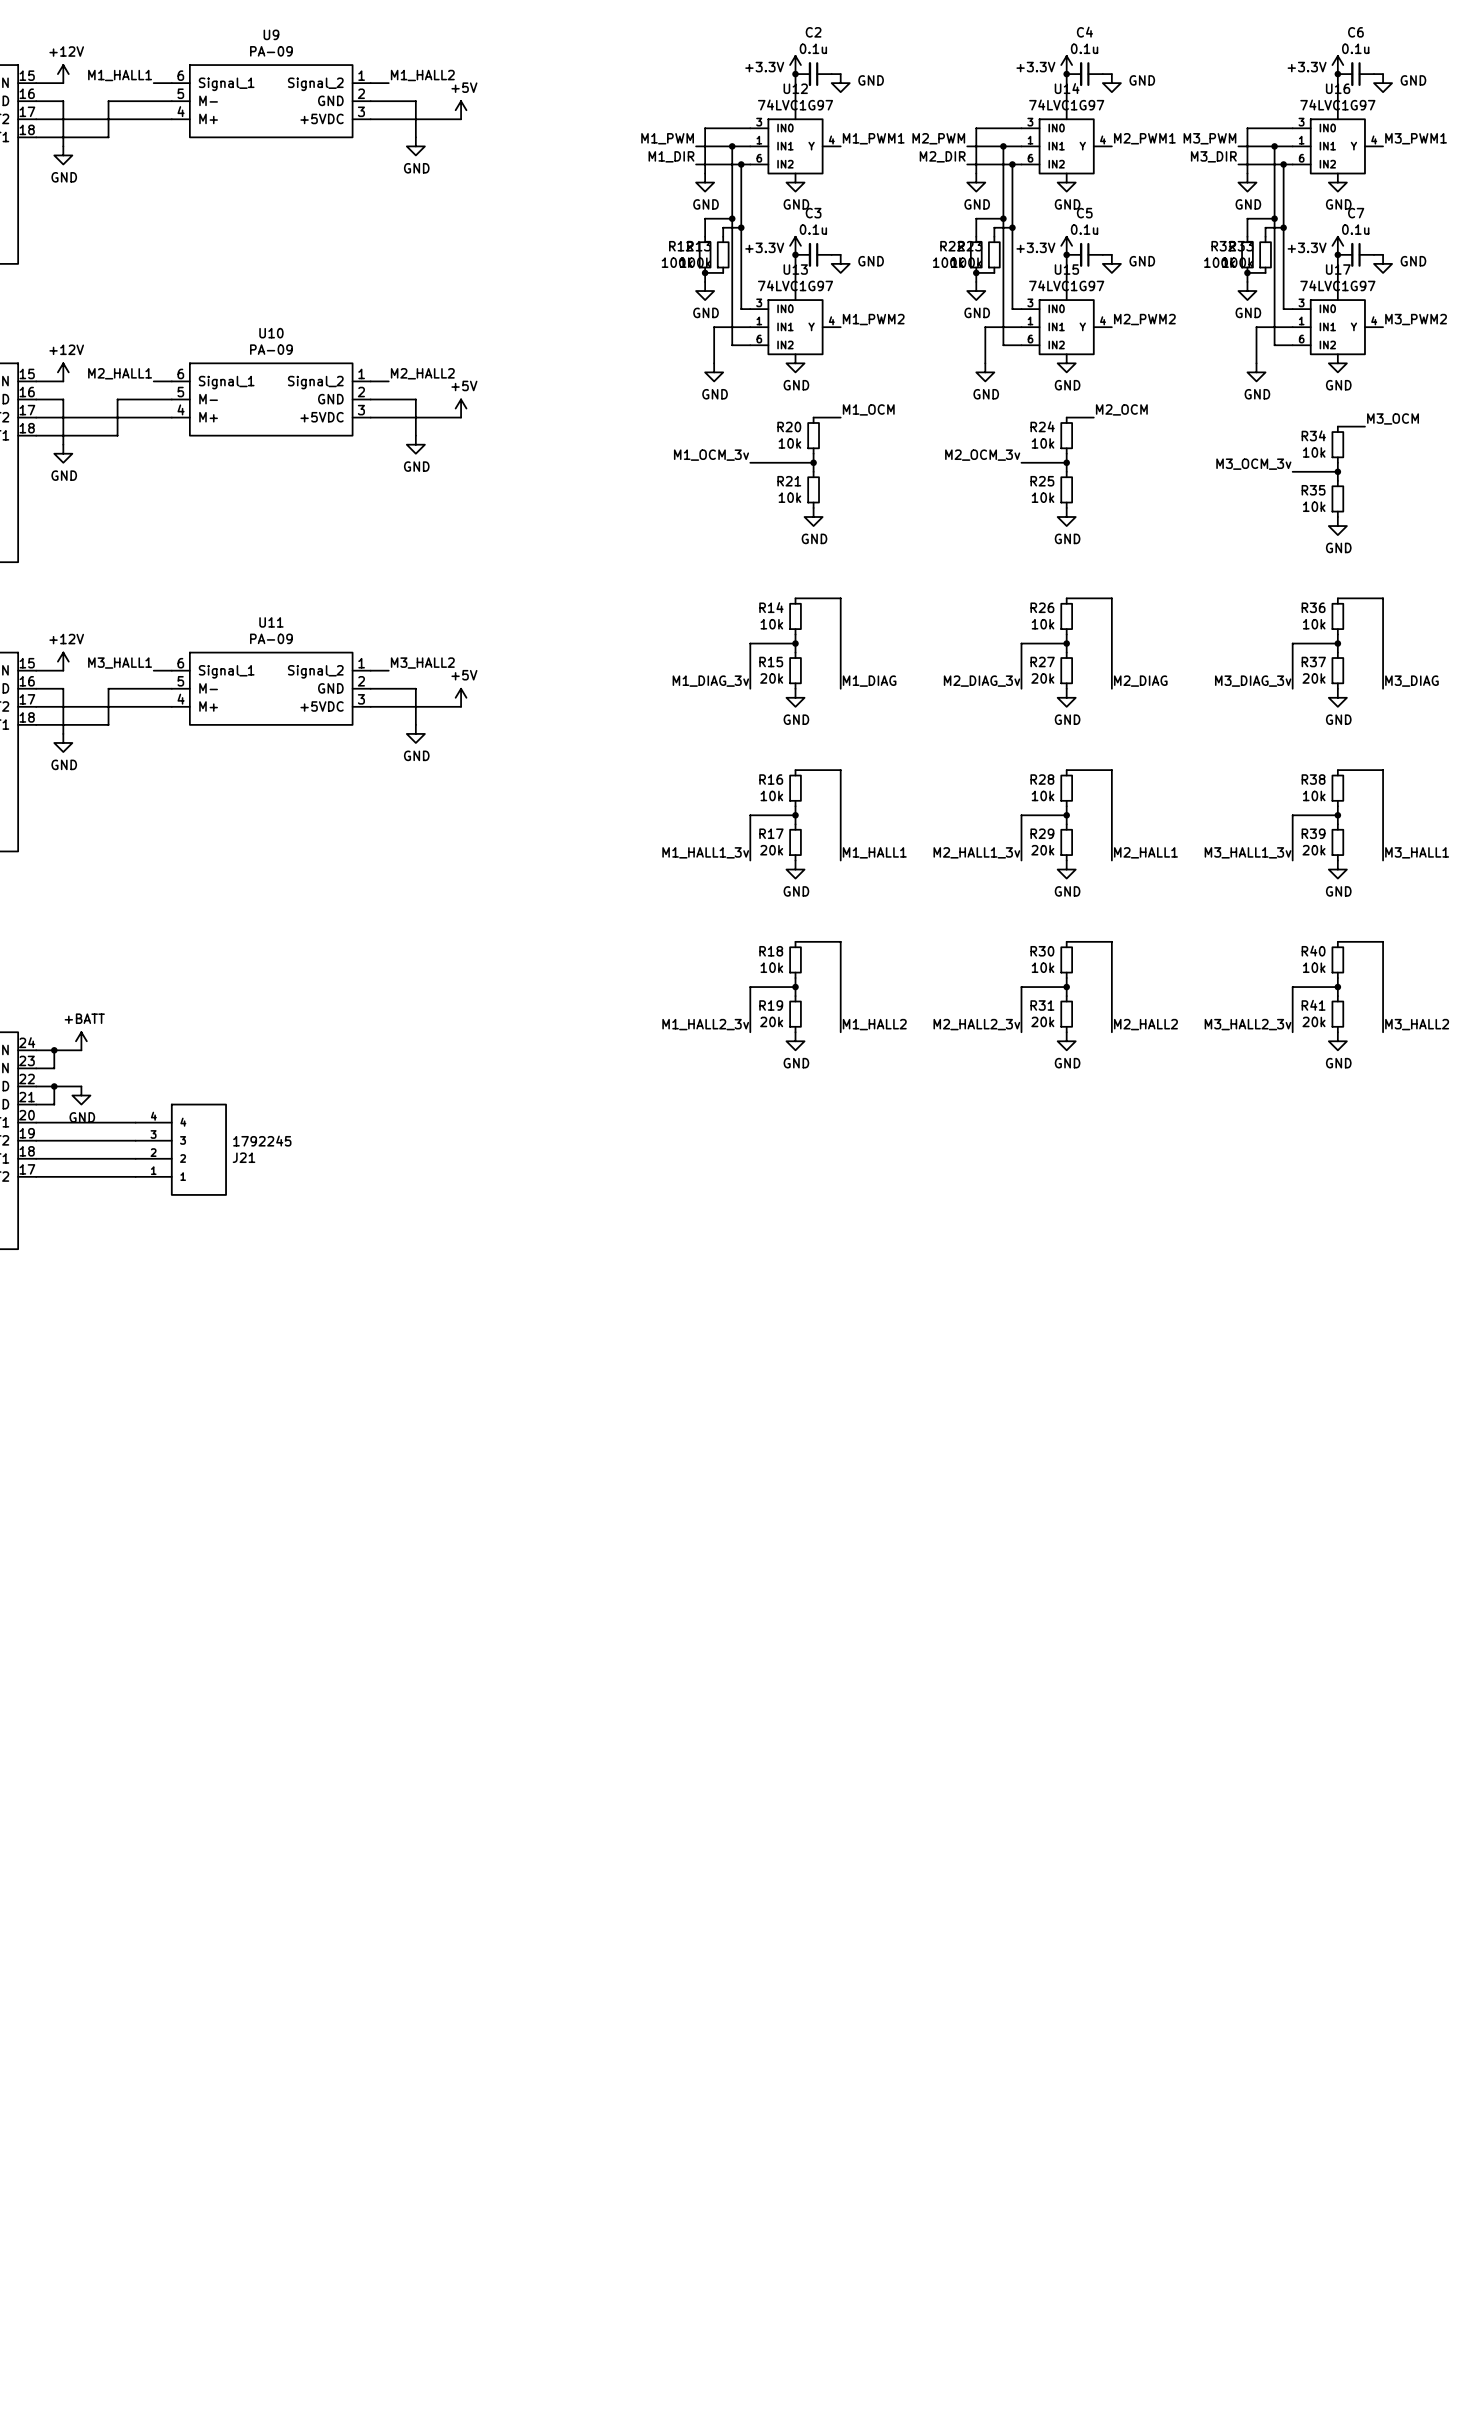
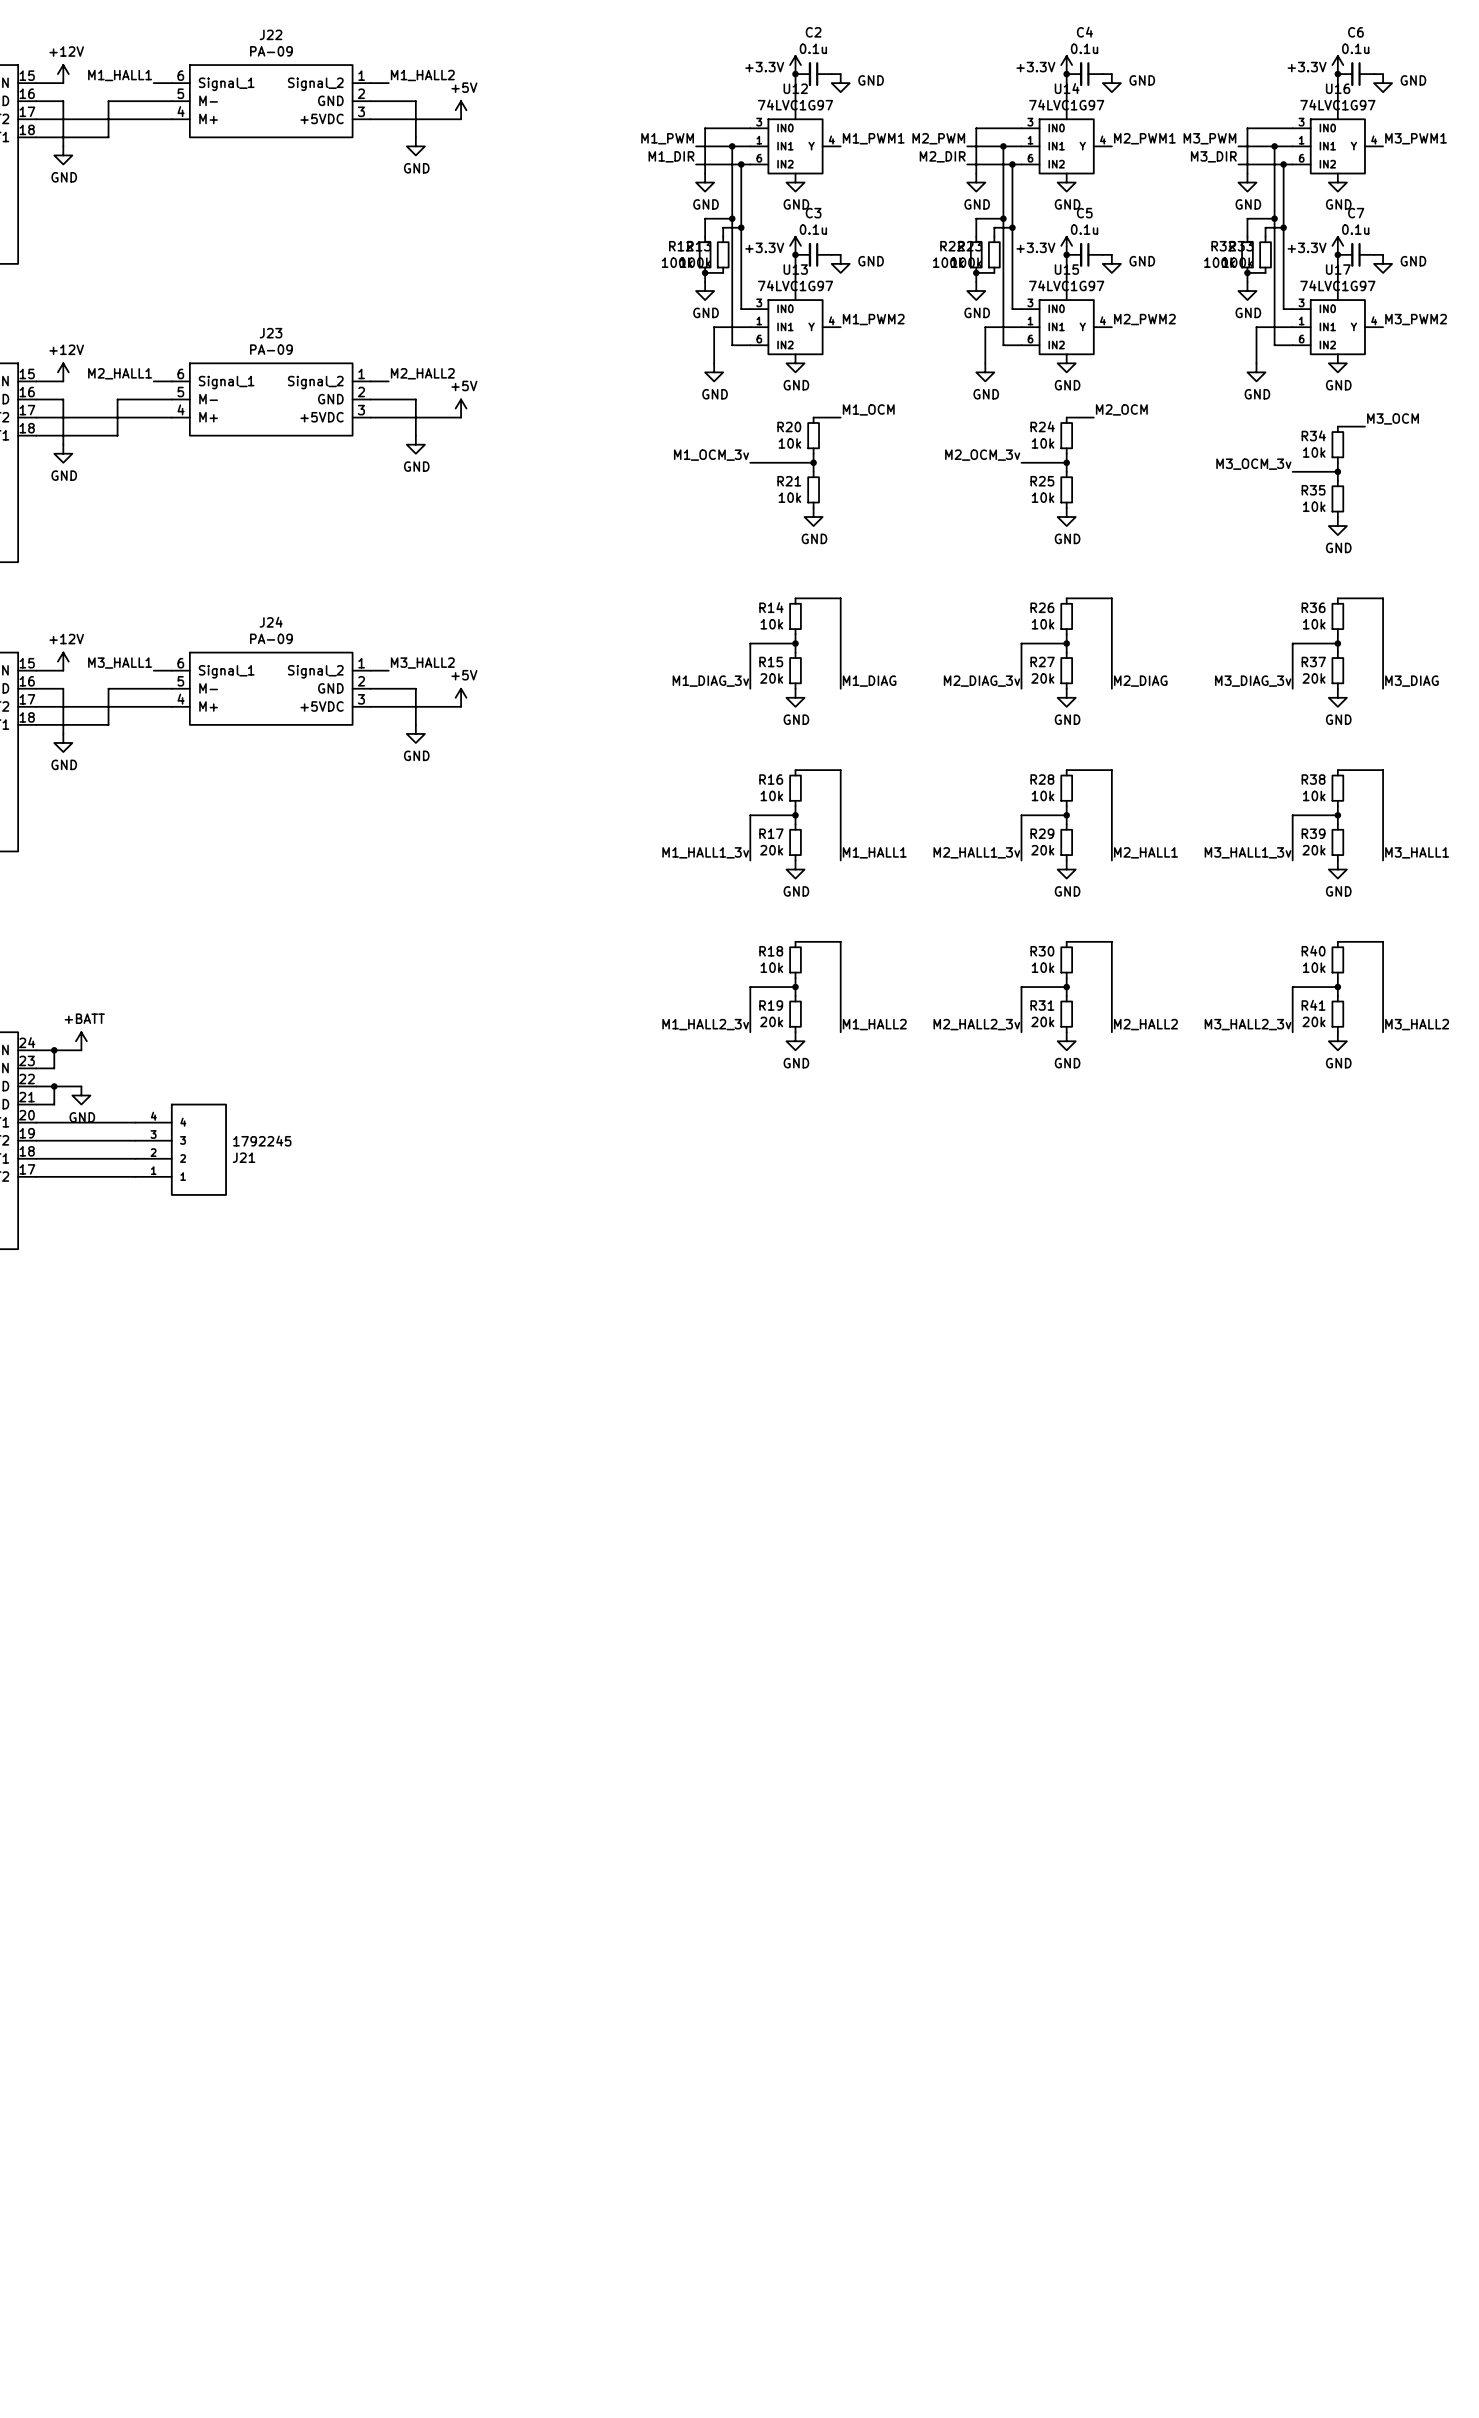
U9 name: U9 (271, 34) -> J22 (271, 34)
U10 name: U10 (271, 333) -> J23 (271, 333)
U11 name: U11 (271, 622) -> J24 (271, 622)

